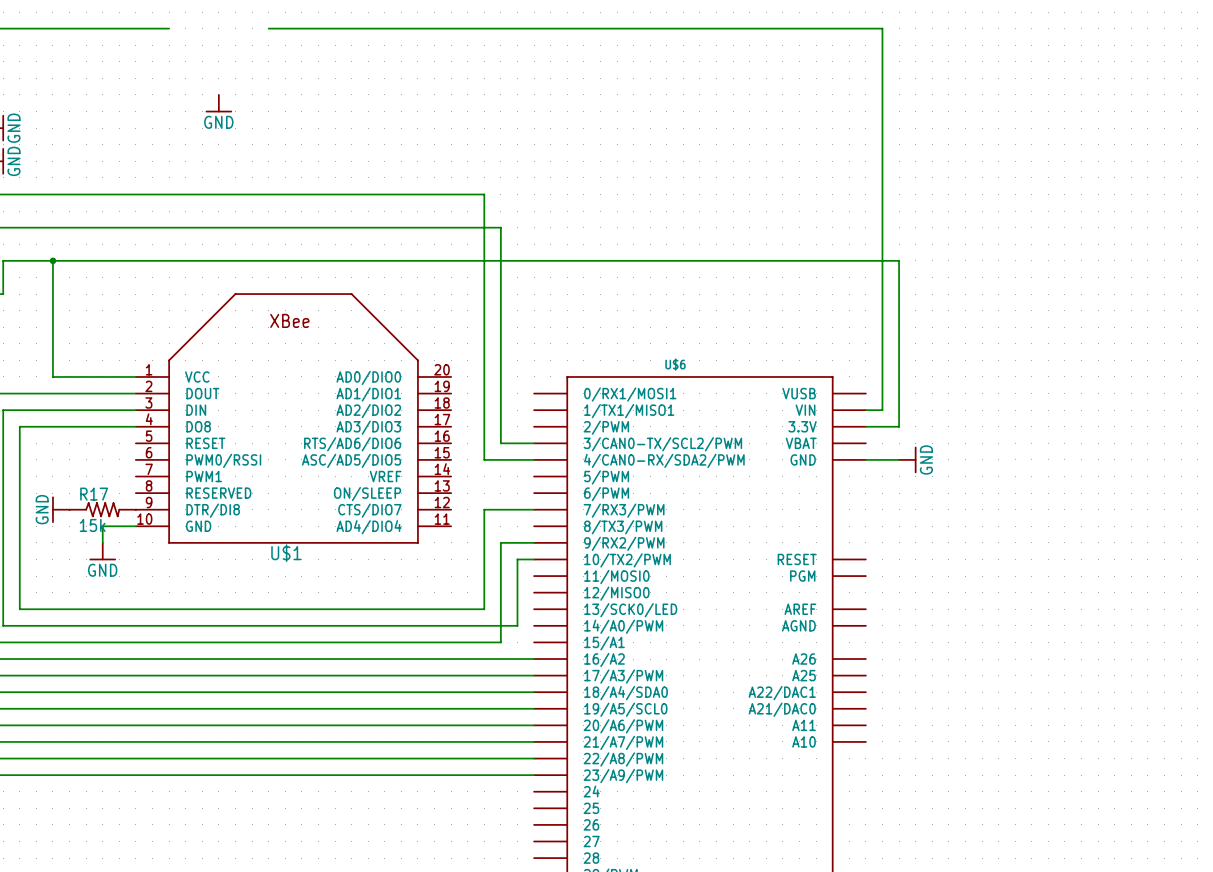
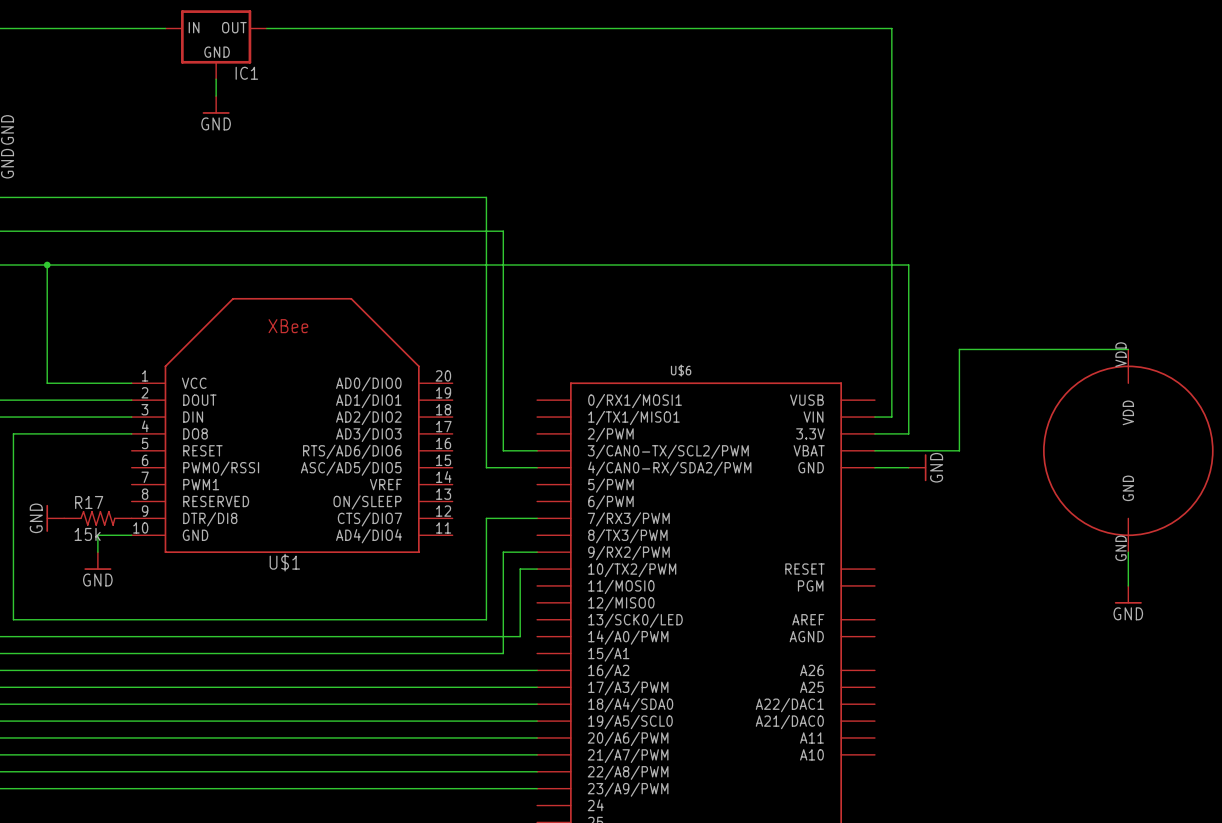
IC1: none -> (216, 44)
wire: none -> (216, 79) (216, 96)
wire: none -> (1128, 349) (959, 349) (959, 450) (874, 450)
part: none -> (1128, 450)
wire: none -> (1128, 552) (1128, 585)
power symbol: none -> GND (1128, 594)

